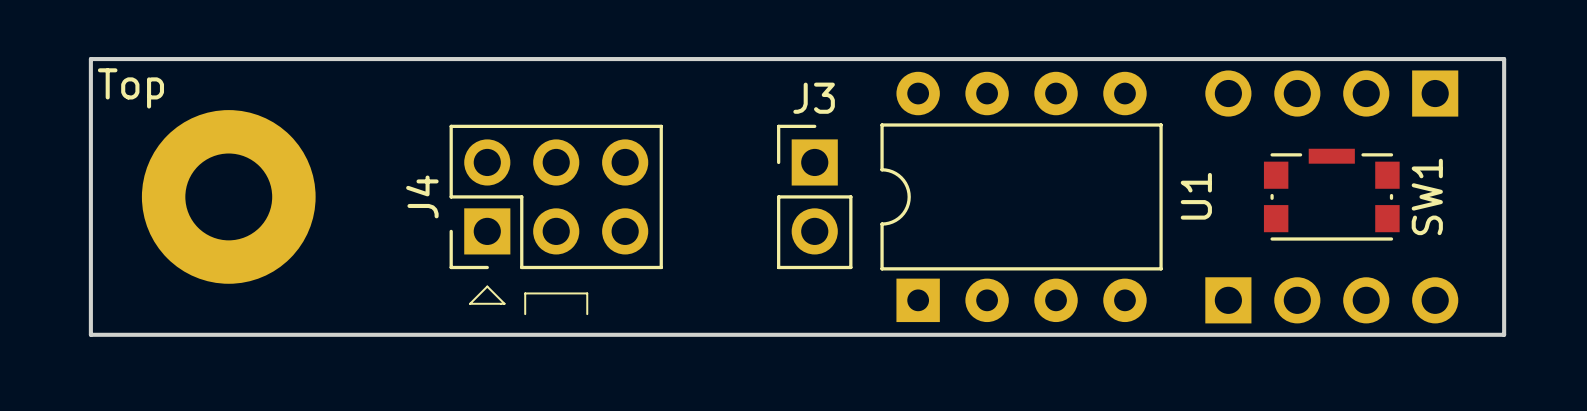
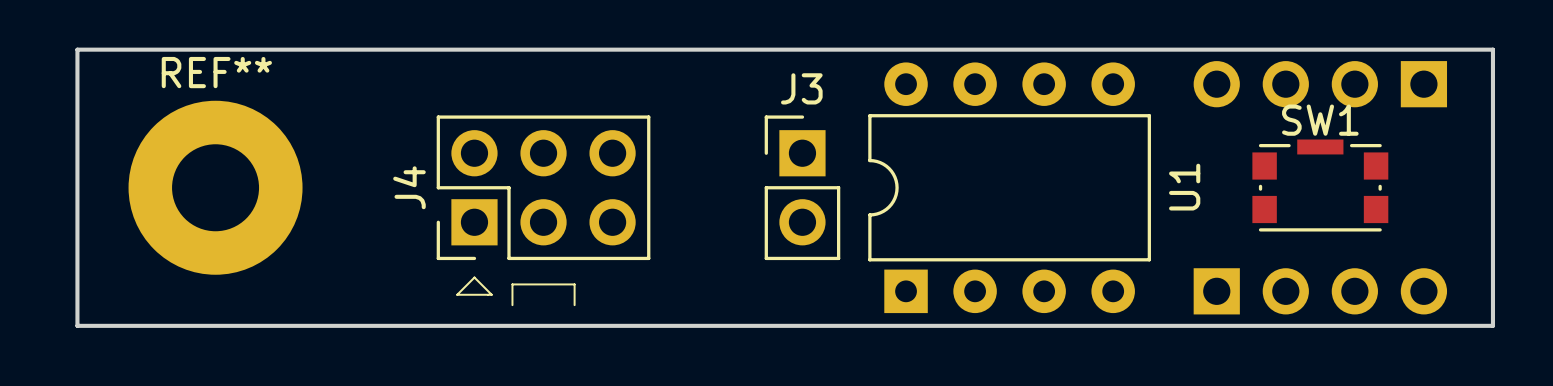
REF** name: none -> REF** (216, 72)
text: Top (130, 88) -> none
SW1 name rotation: 0° (1427, 196) -> 90° clockwise (1320, 120)
SW1 name position: SW1 (1427, 196) -> SW1 (1320, 120)

